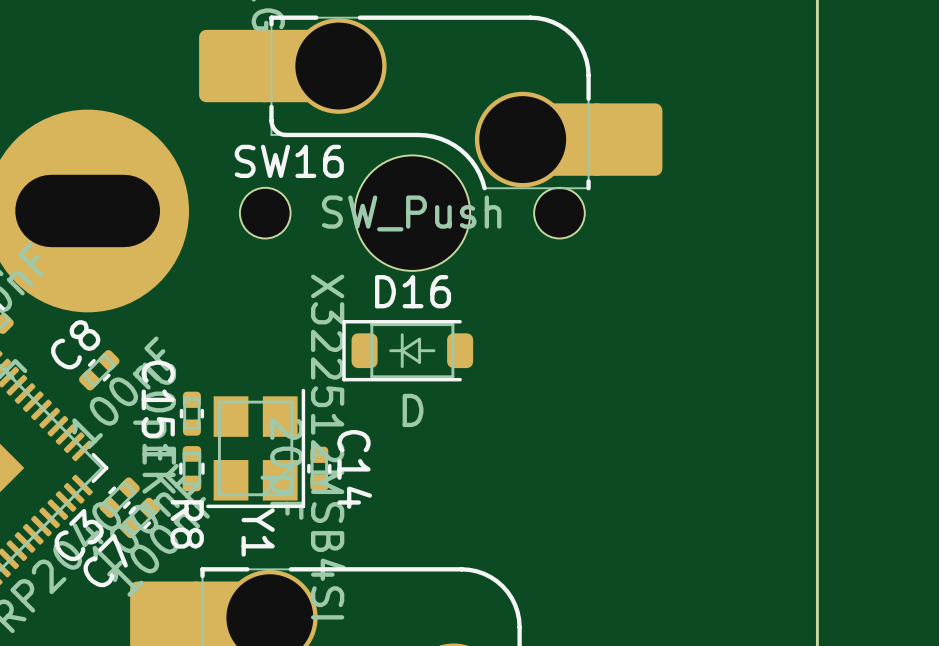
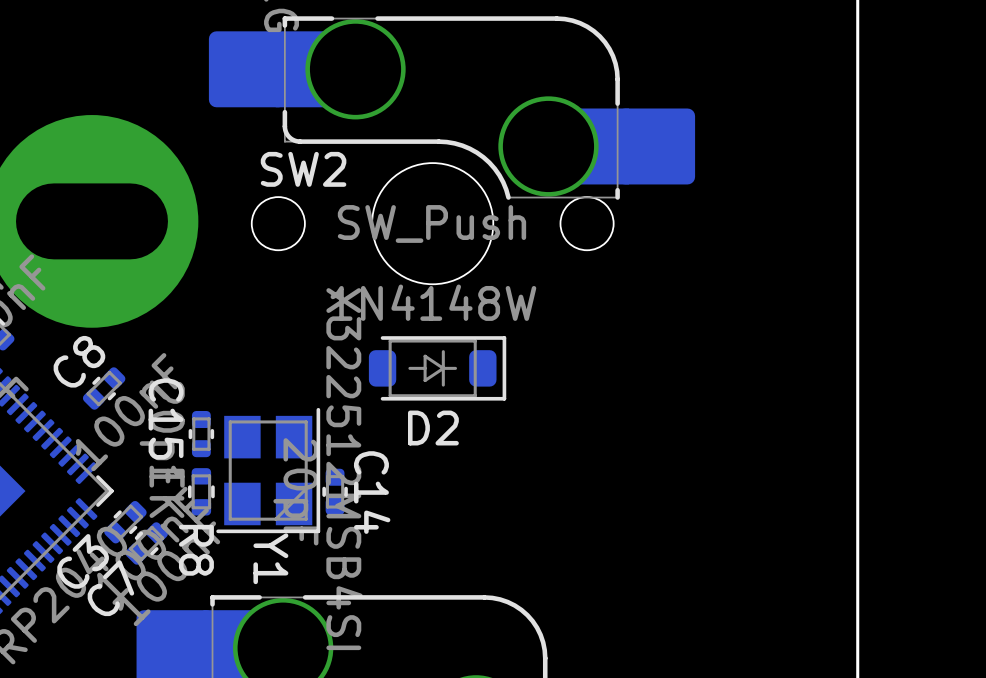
SW16 name: SW16 (289, 161) -> SW2 (303, 169)
D16: D (407, 350) -> none
D2: none -> 1N4148W (437, 368)

